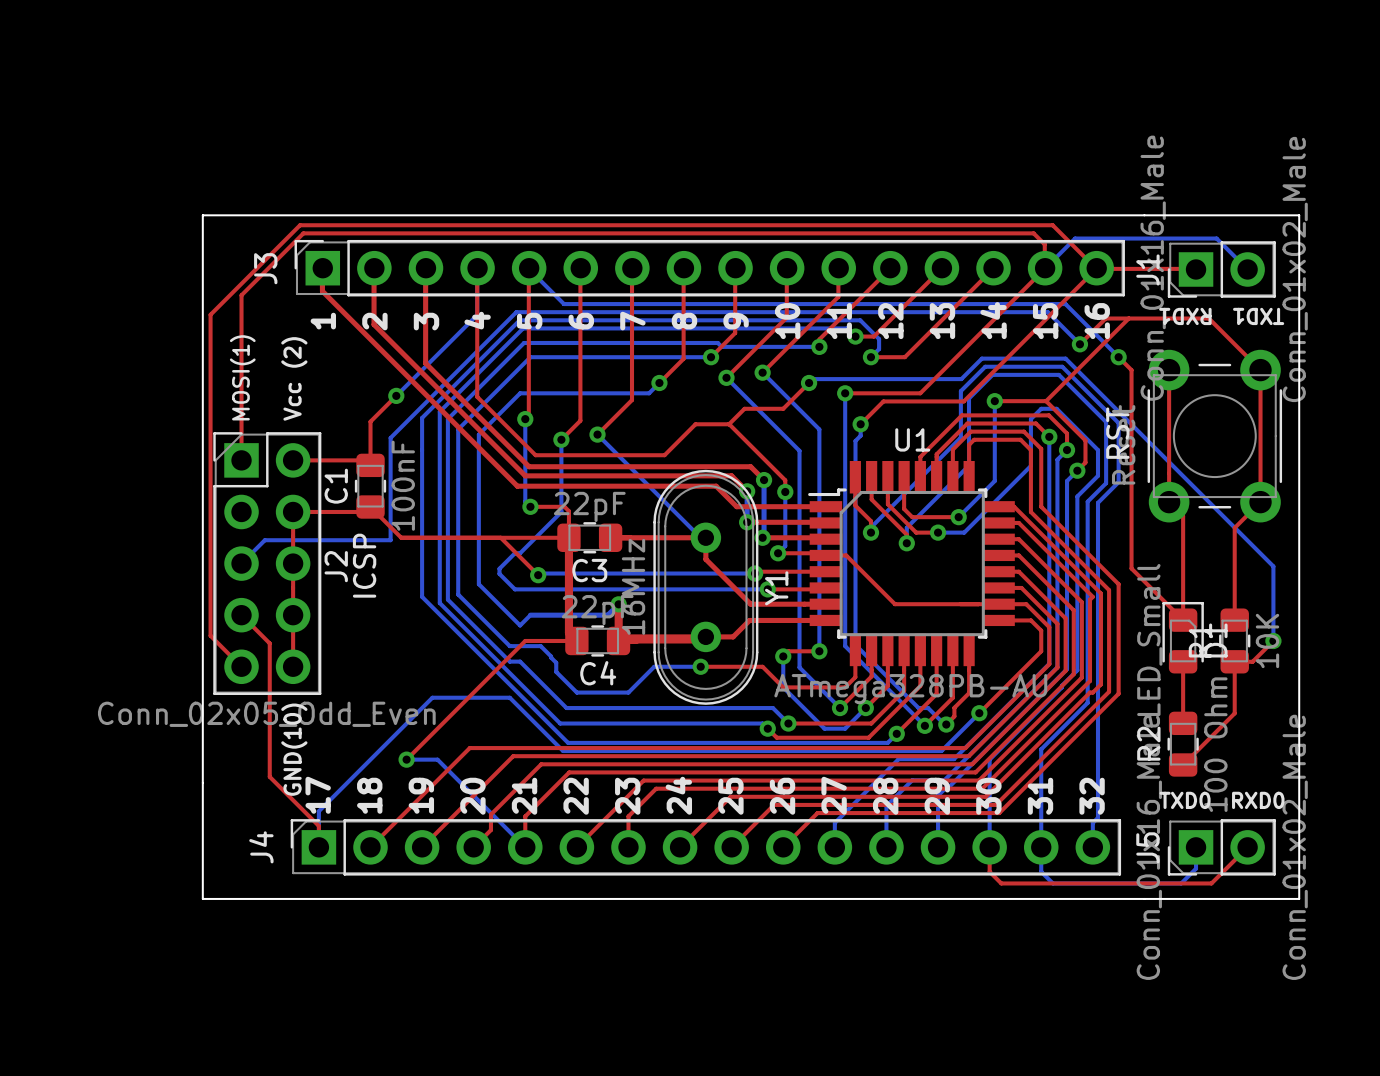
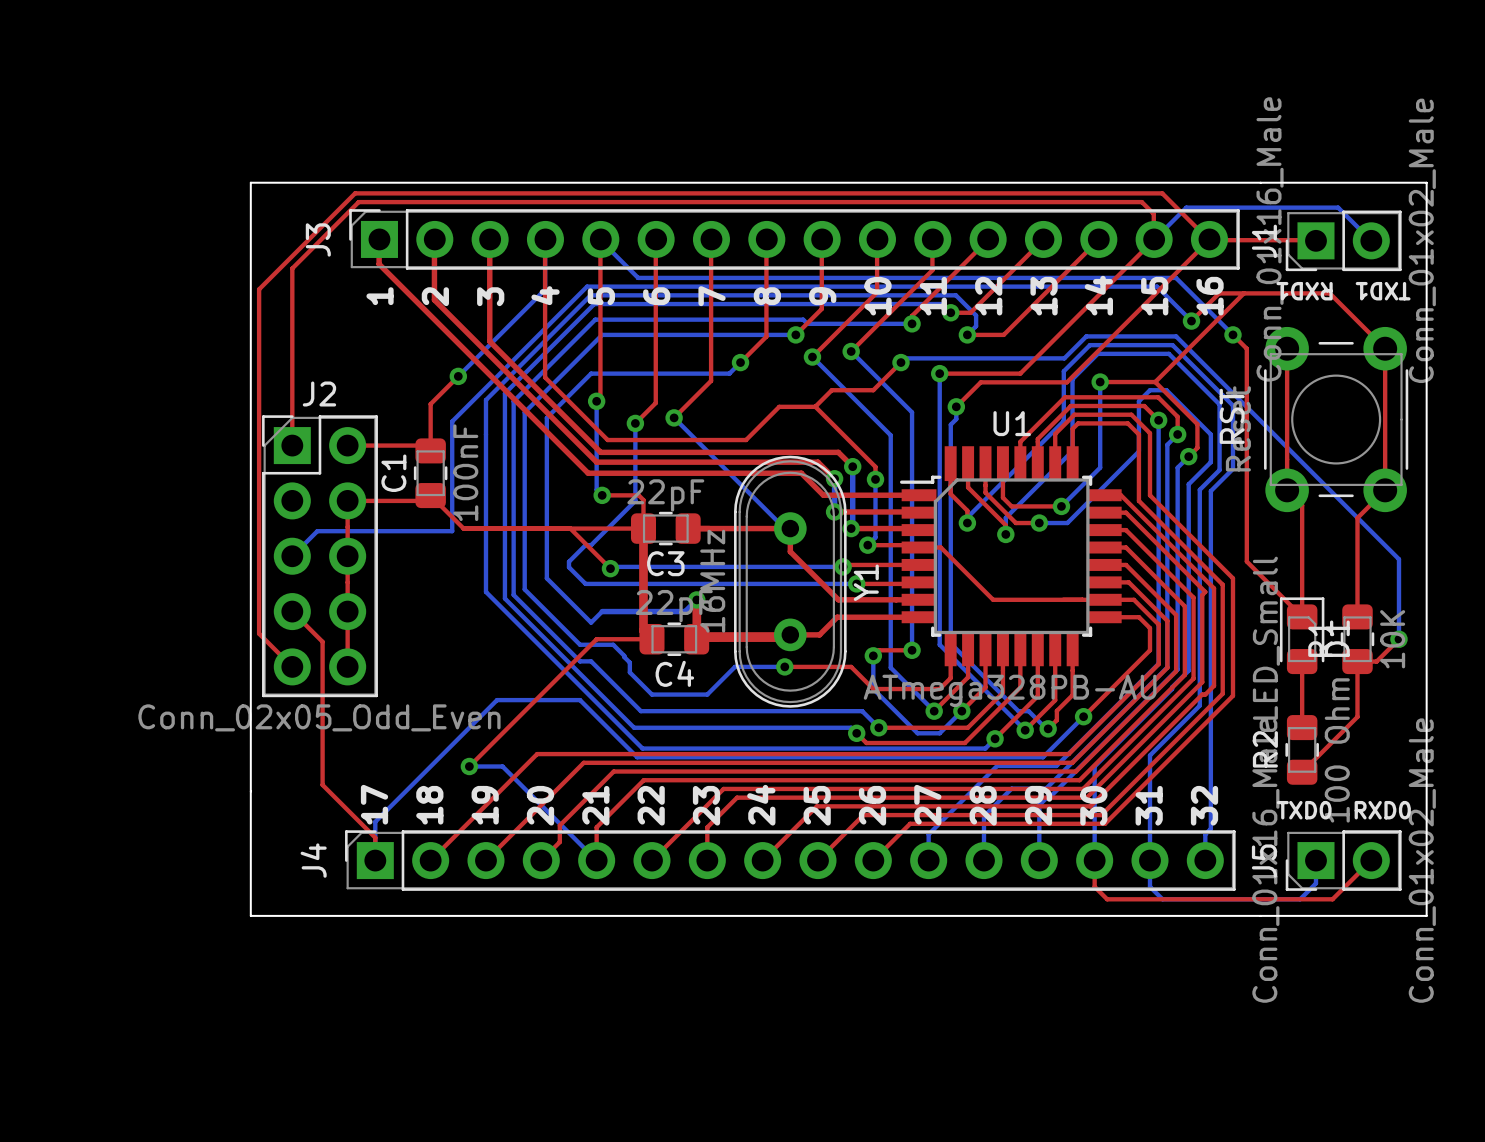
text: MOSI(1) (242, 377) -> none
text: Vcc (2) (294, 378) -> none
text: ICSP (364, 565) -> none
J2 name rotation: 0° (336, 566) -> 90° clockwise (319, 393)
J2 name position: J2 (336, 566) -> J2 (319, 393)
text: GND(10) (294, 749) -> none

